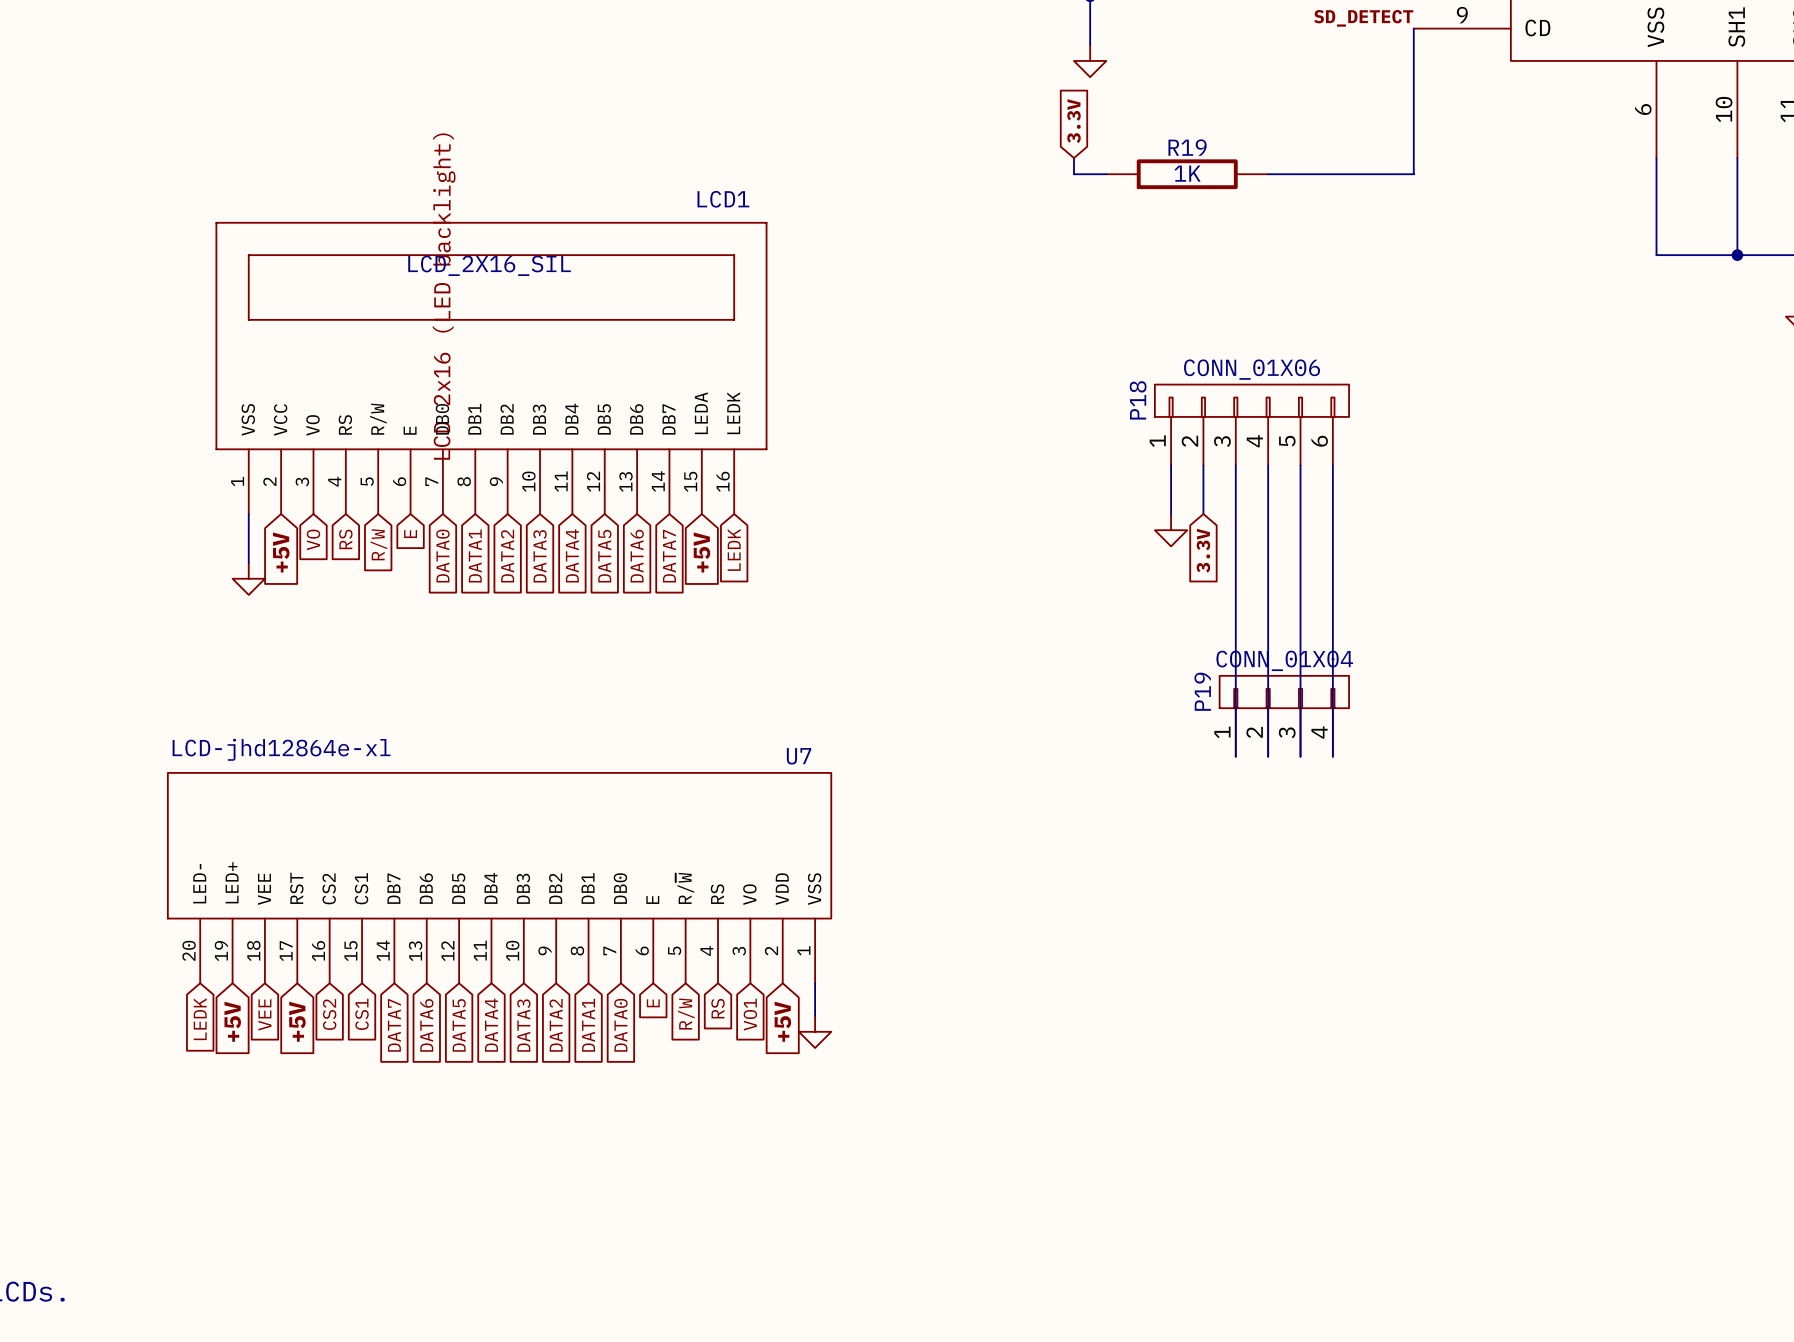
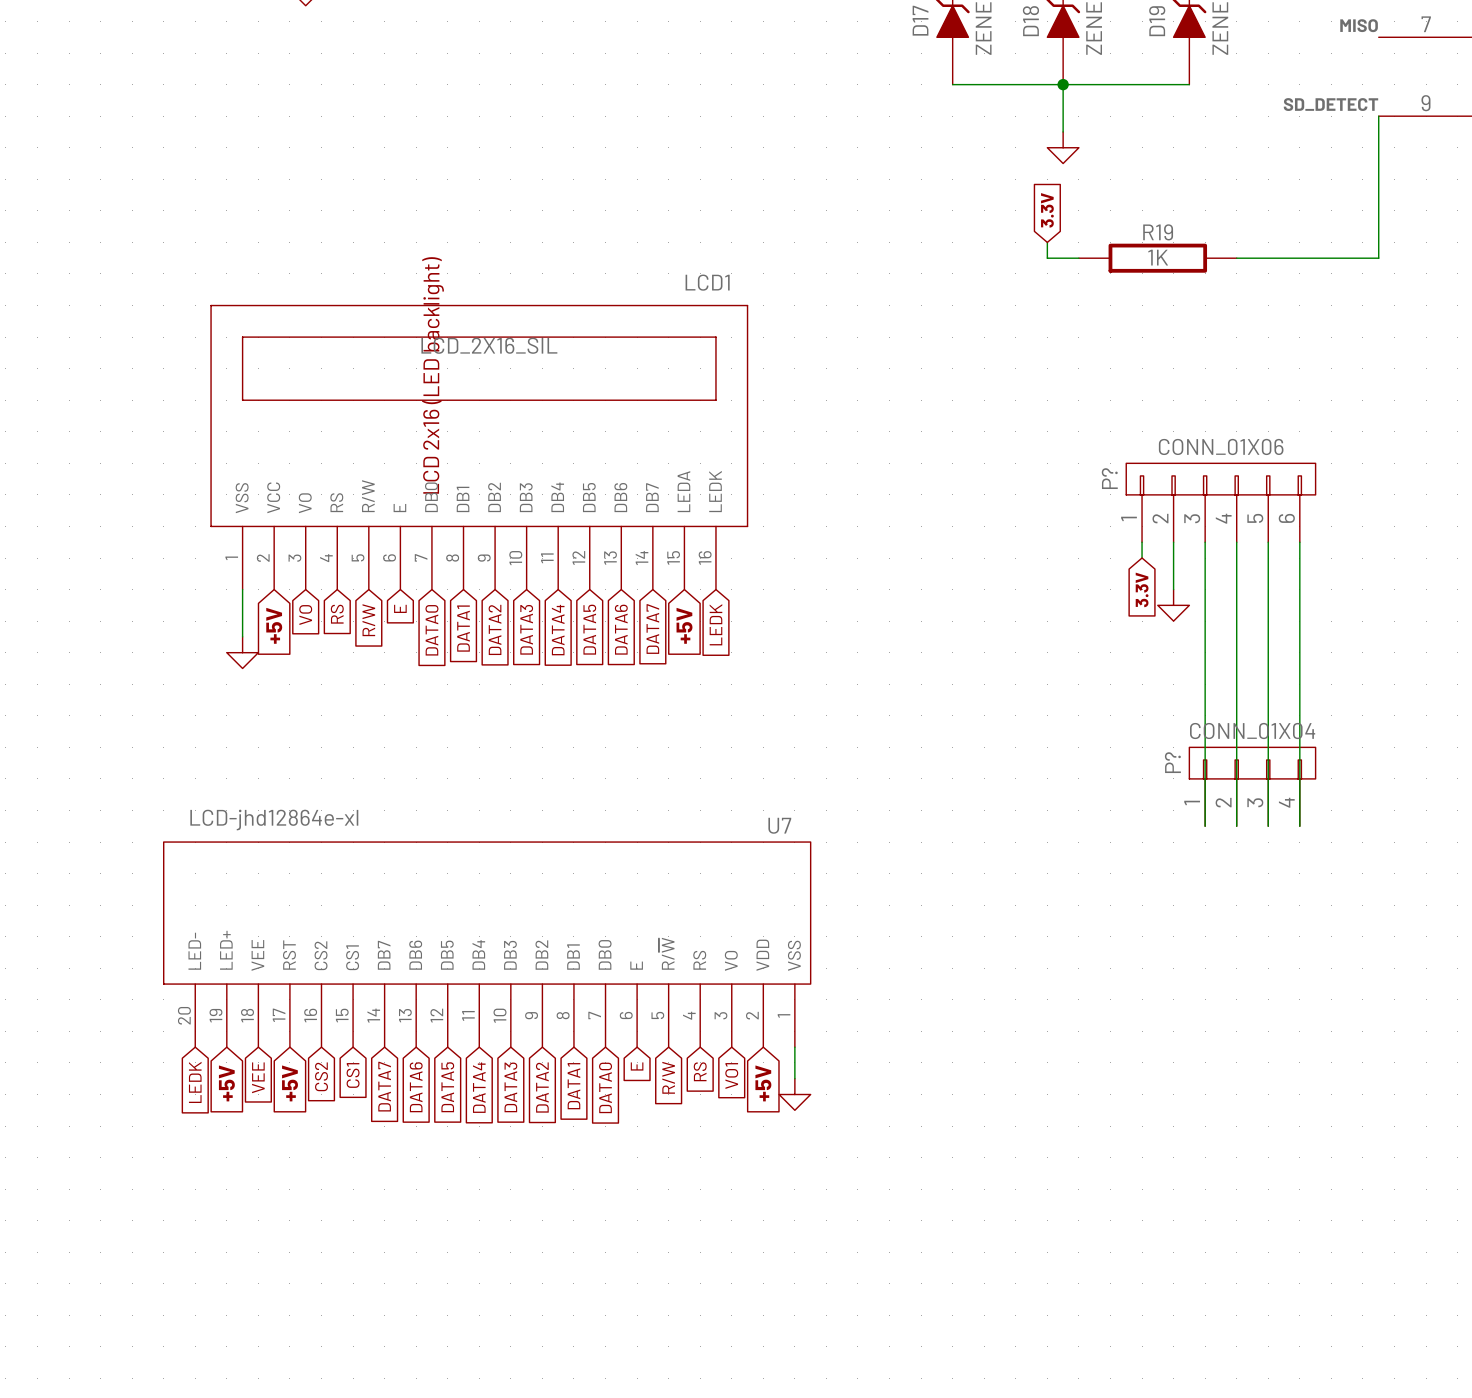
P18 name: P18 (1138, 400) -> P? (1109, 478)
wire: (1171, 481) (1171, 514) -> none
power symbol position: (1171, 530) -> (1173, 605)
global label position: 3.3V (1203, 550) -> 3.3V (1142, 589)
P19 name: P19 (1202, 691) -> P? (1172, 762)

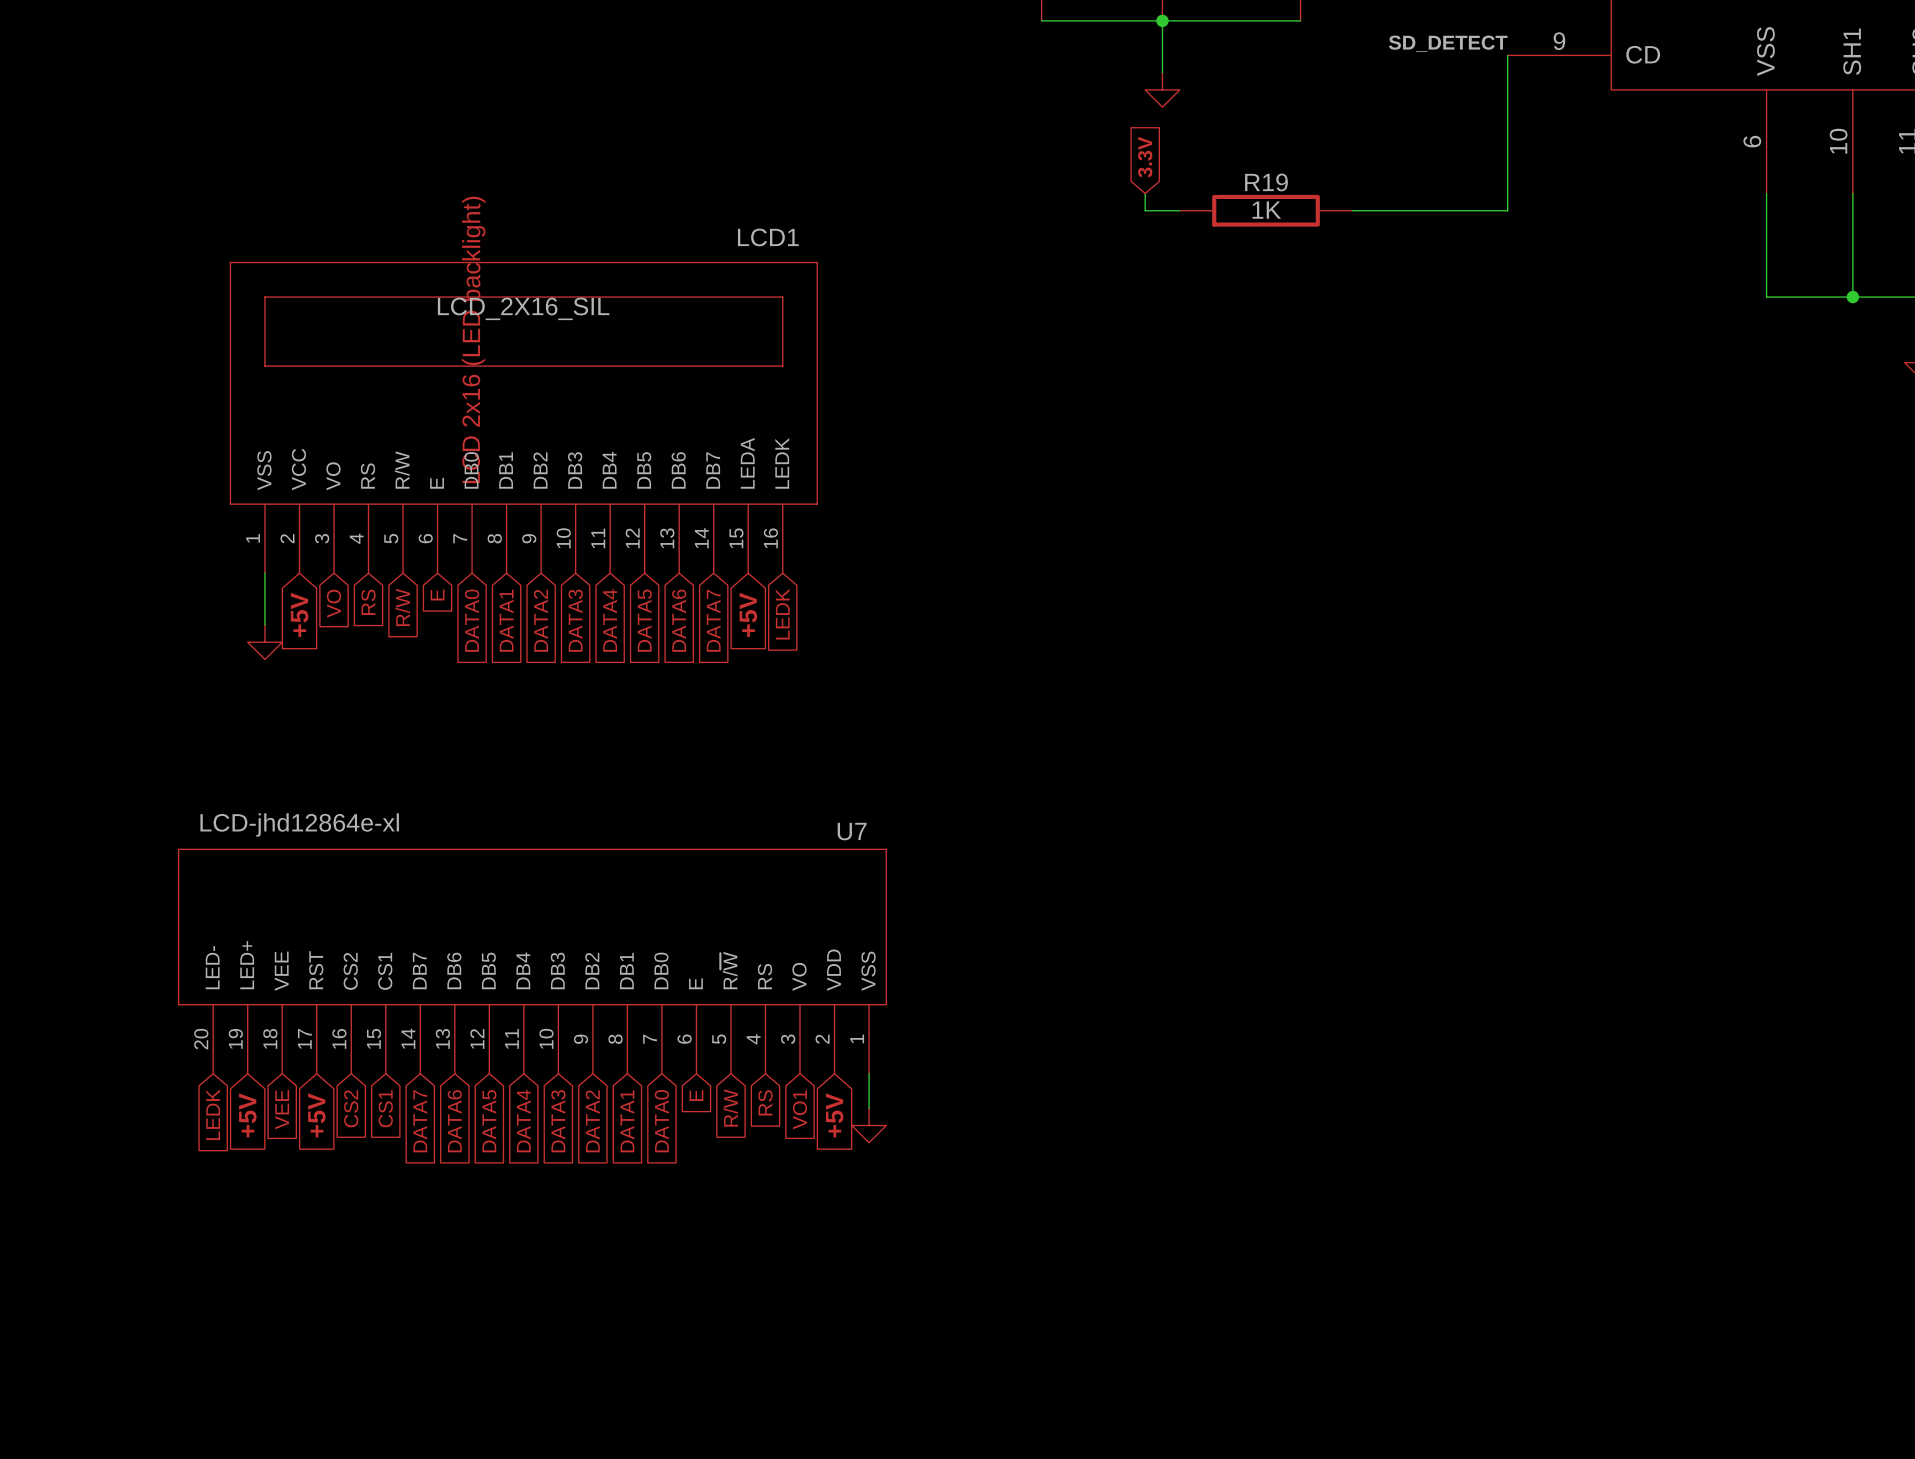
P?: CONN_01X06 (1220, 502) -> none
wire: (1142, 542) (1142, 558) -> none
wire: (1173, 542) (1173, 589) -> none
wire: (1205, 542) (1205, 826) -> none
wire: (1236, 542) (1236, 826) -> none
wire: (1268, 542) (1268, 826) -> none
wire: (1299, 542) (1299, 826) -> none
global label: 3.3V (1142, 589) -> none
power symbol: (1173, 605) -> none
P?: CONN_01X04 (1252, 786) -> none

